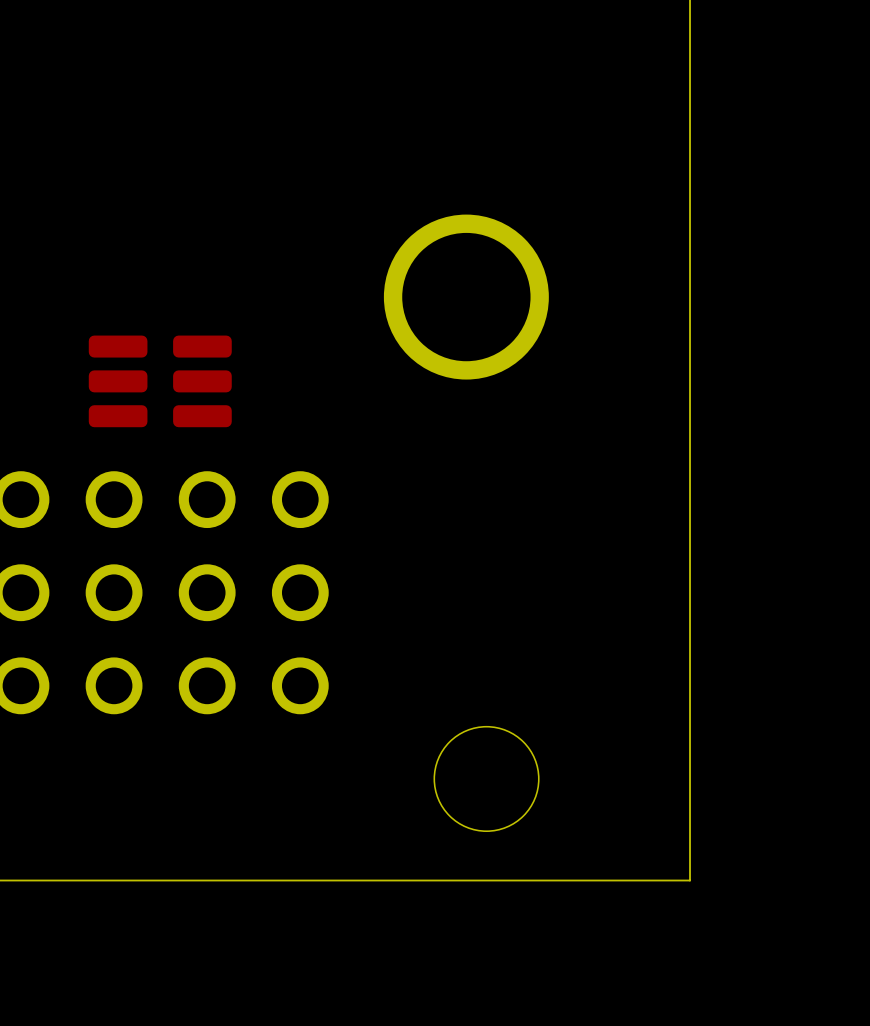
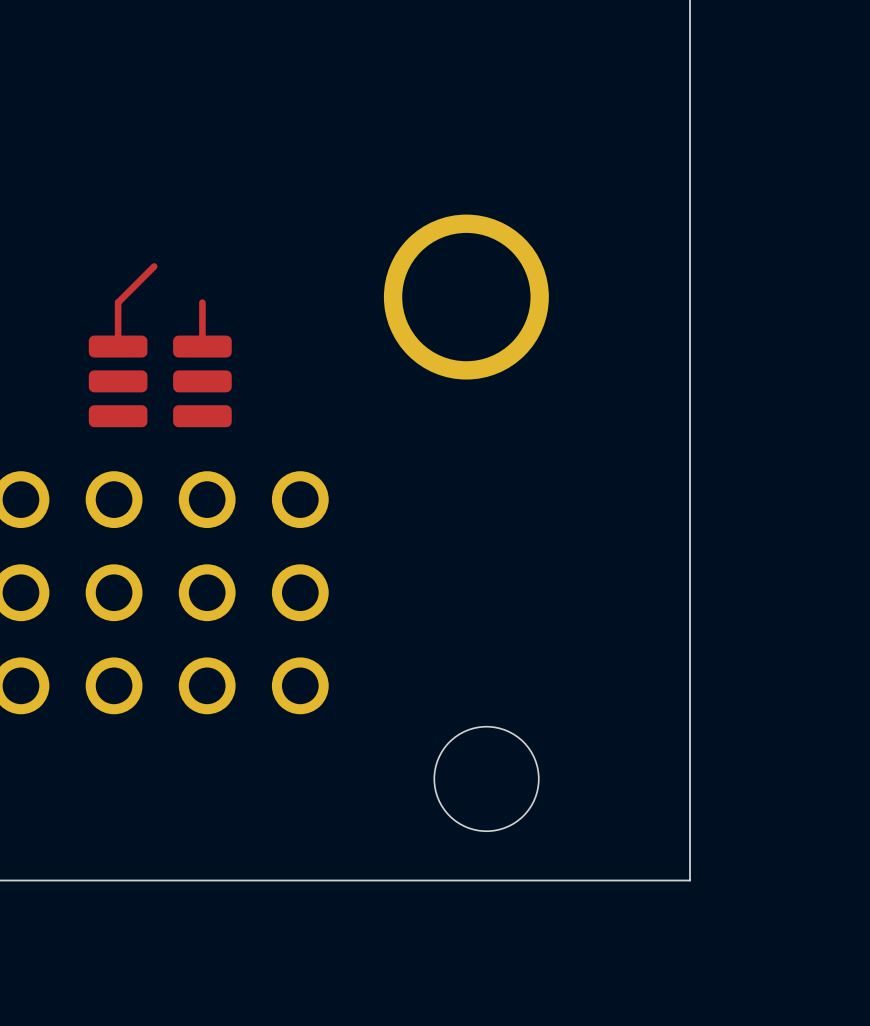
top track: none -> (154, 266) (118, 302) (118, 346)
top track: none -> (202, 302) (202, 346)

